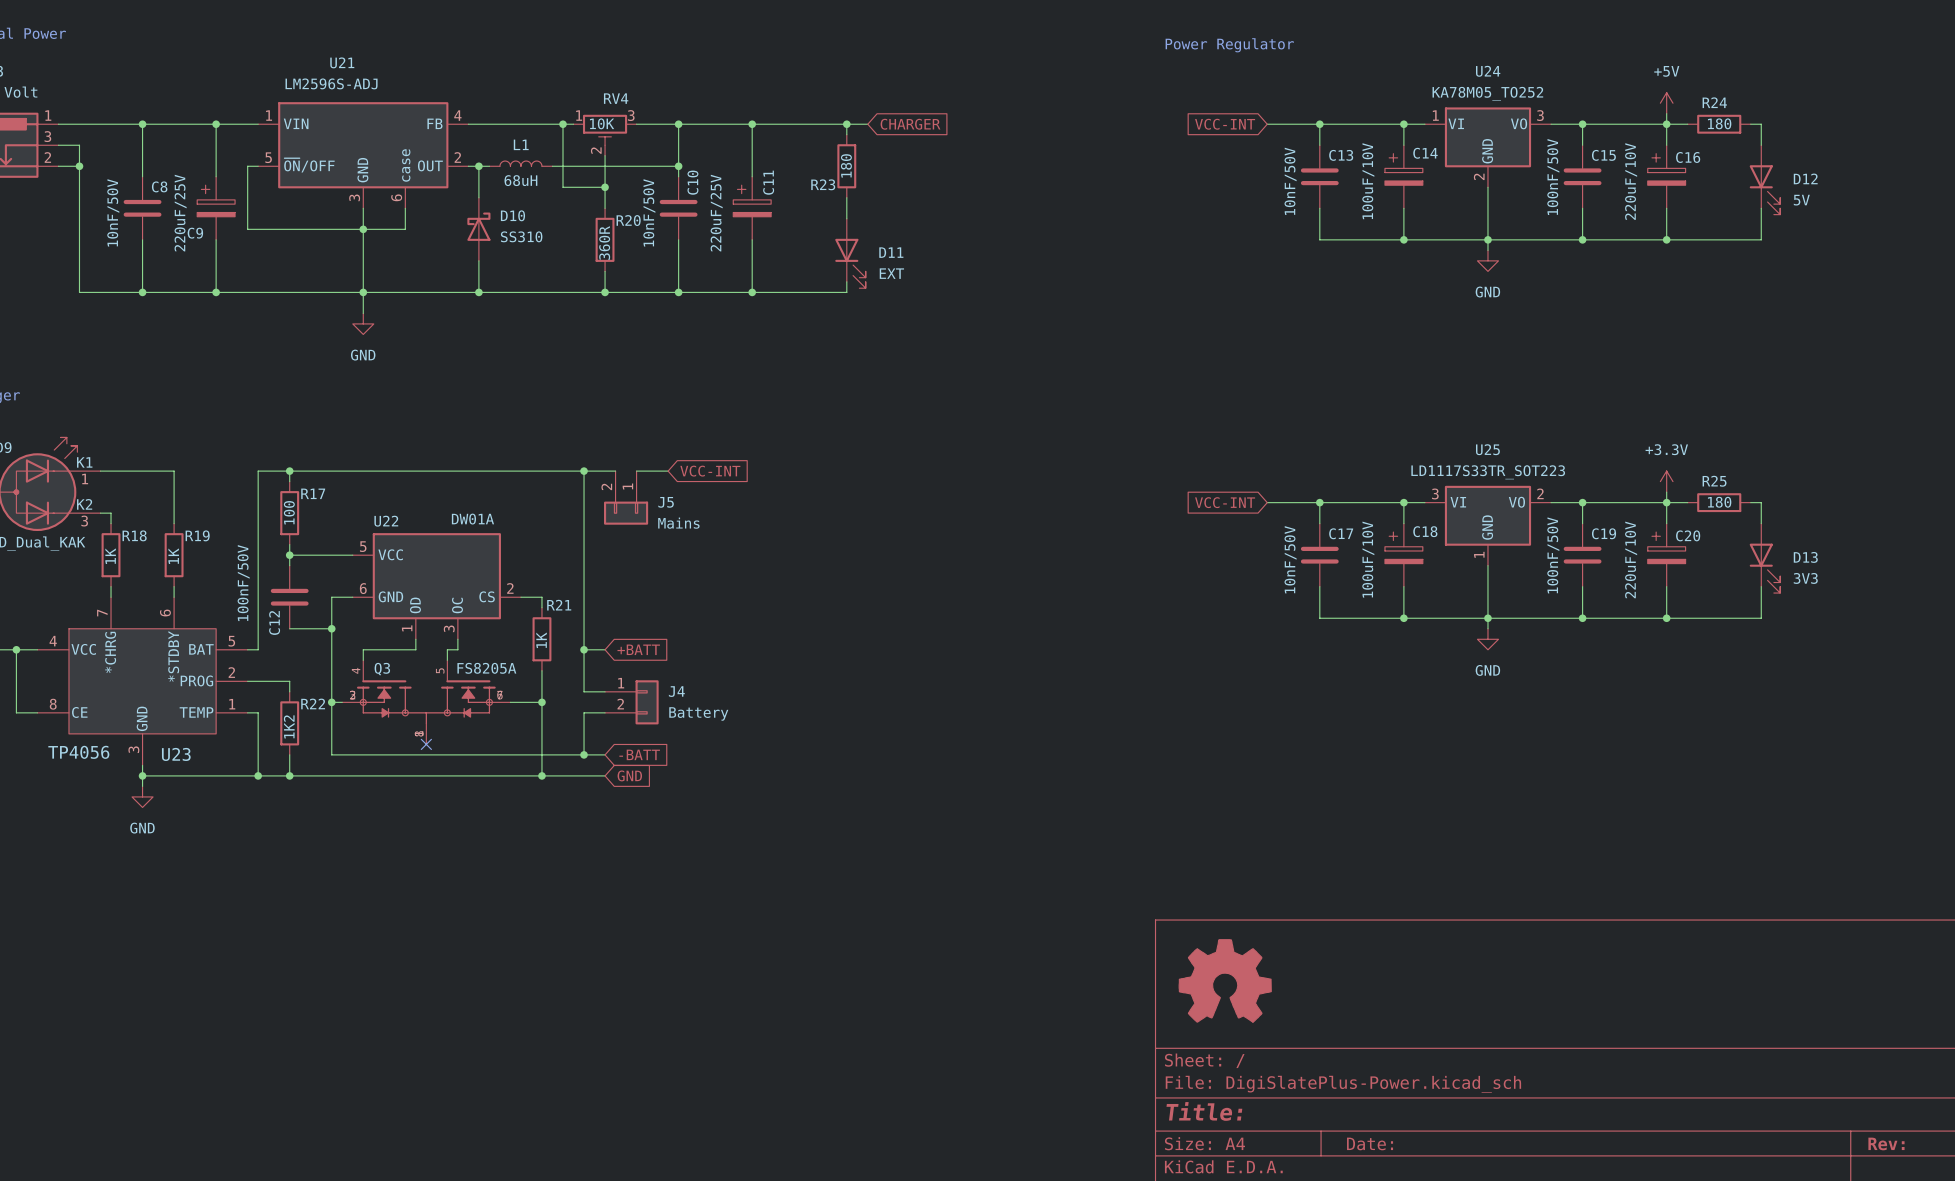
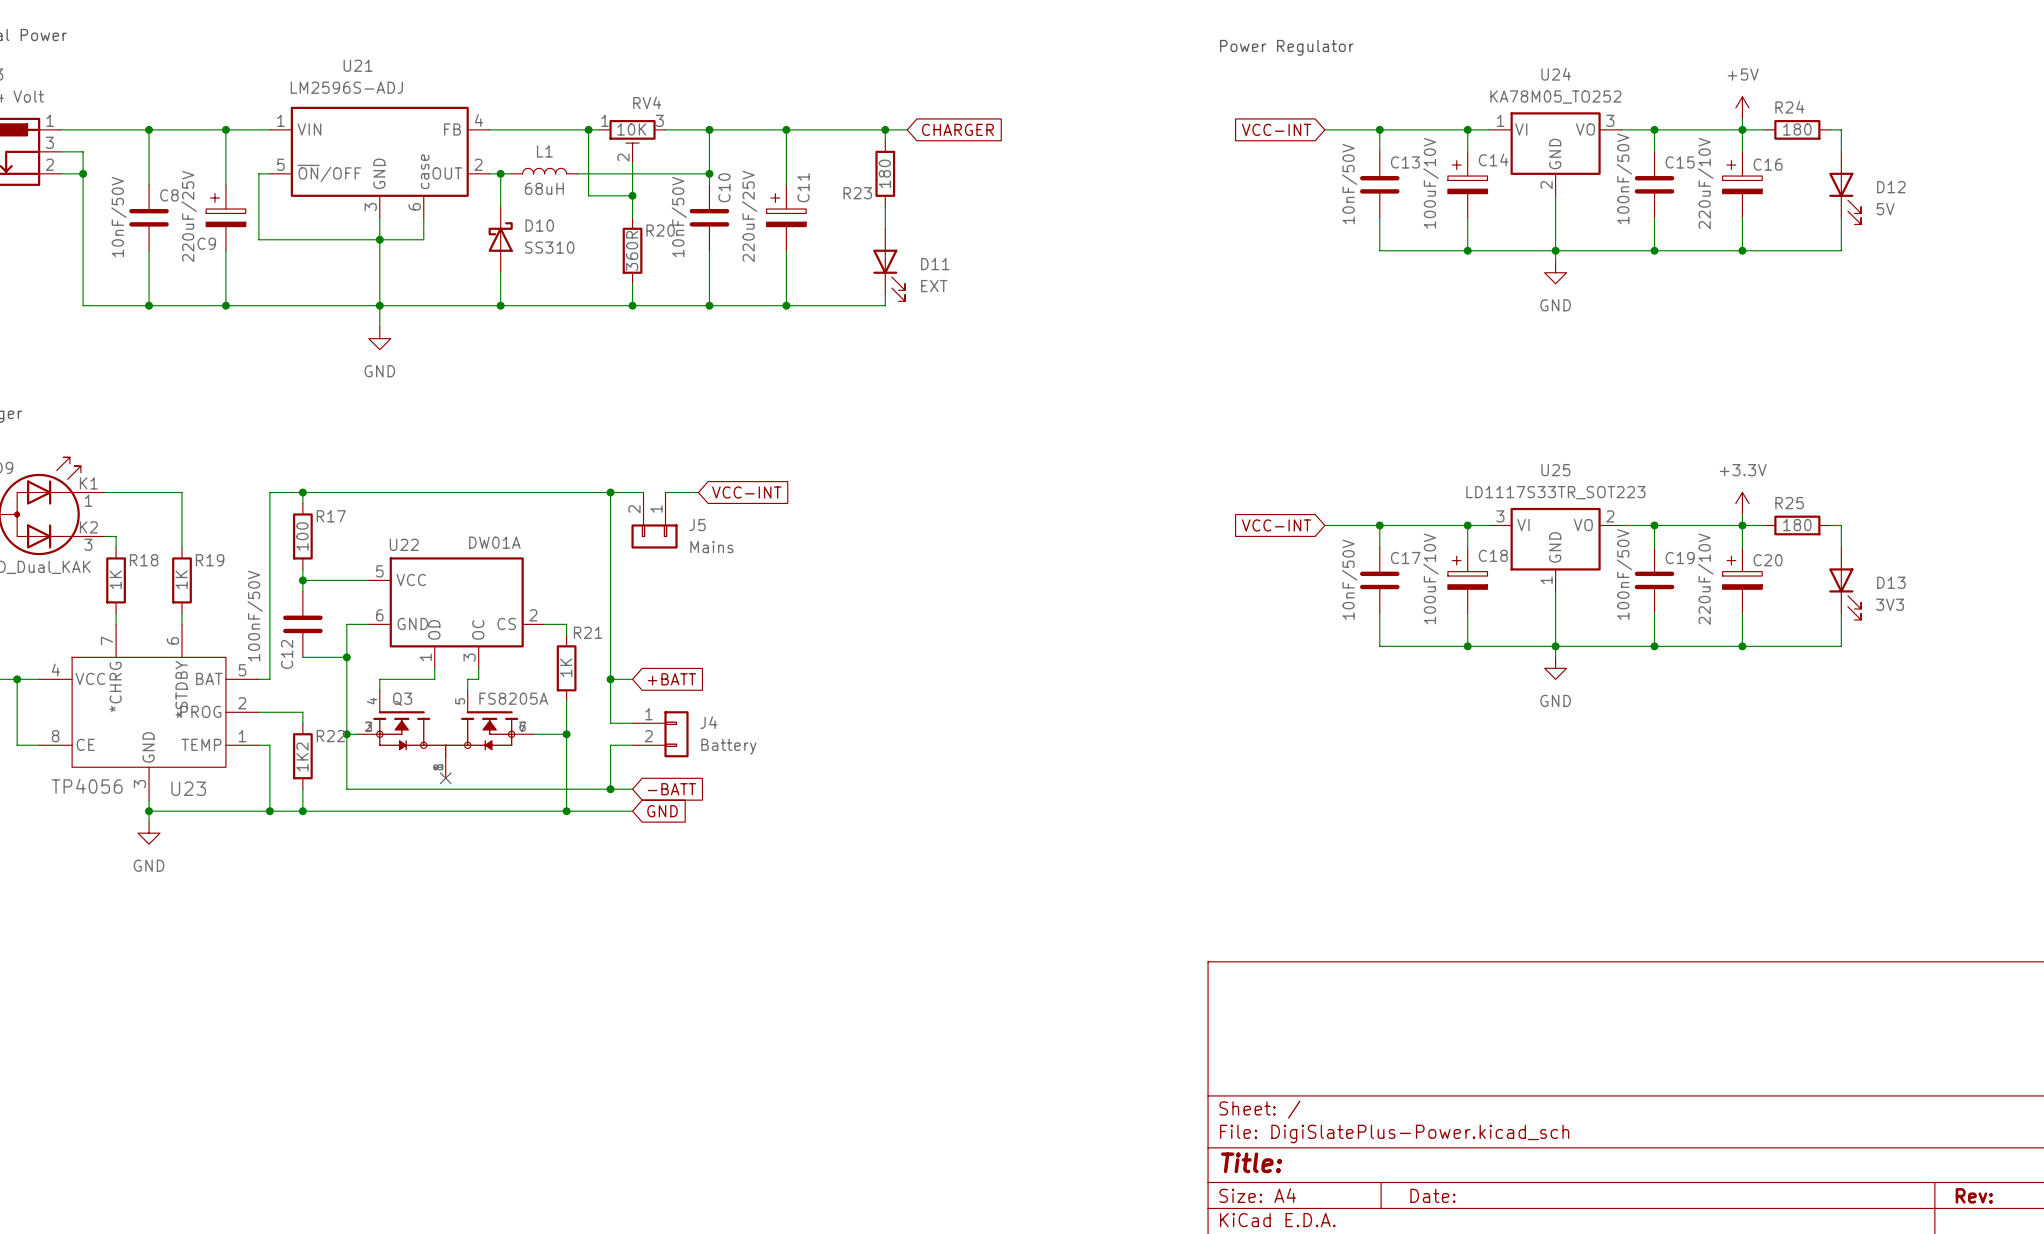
power symbol: (1225, 980) -> none

